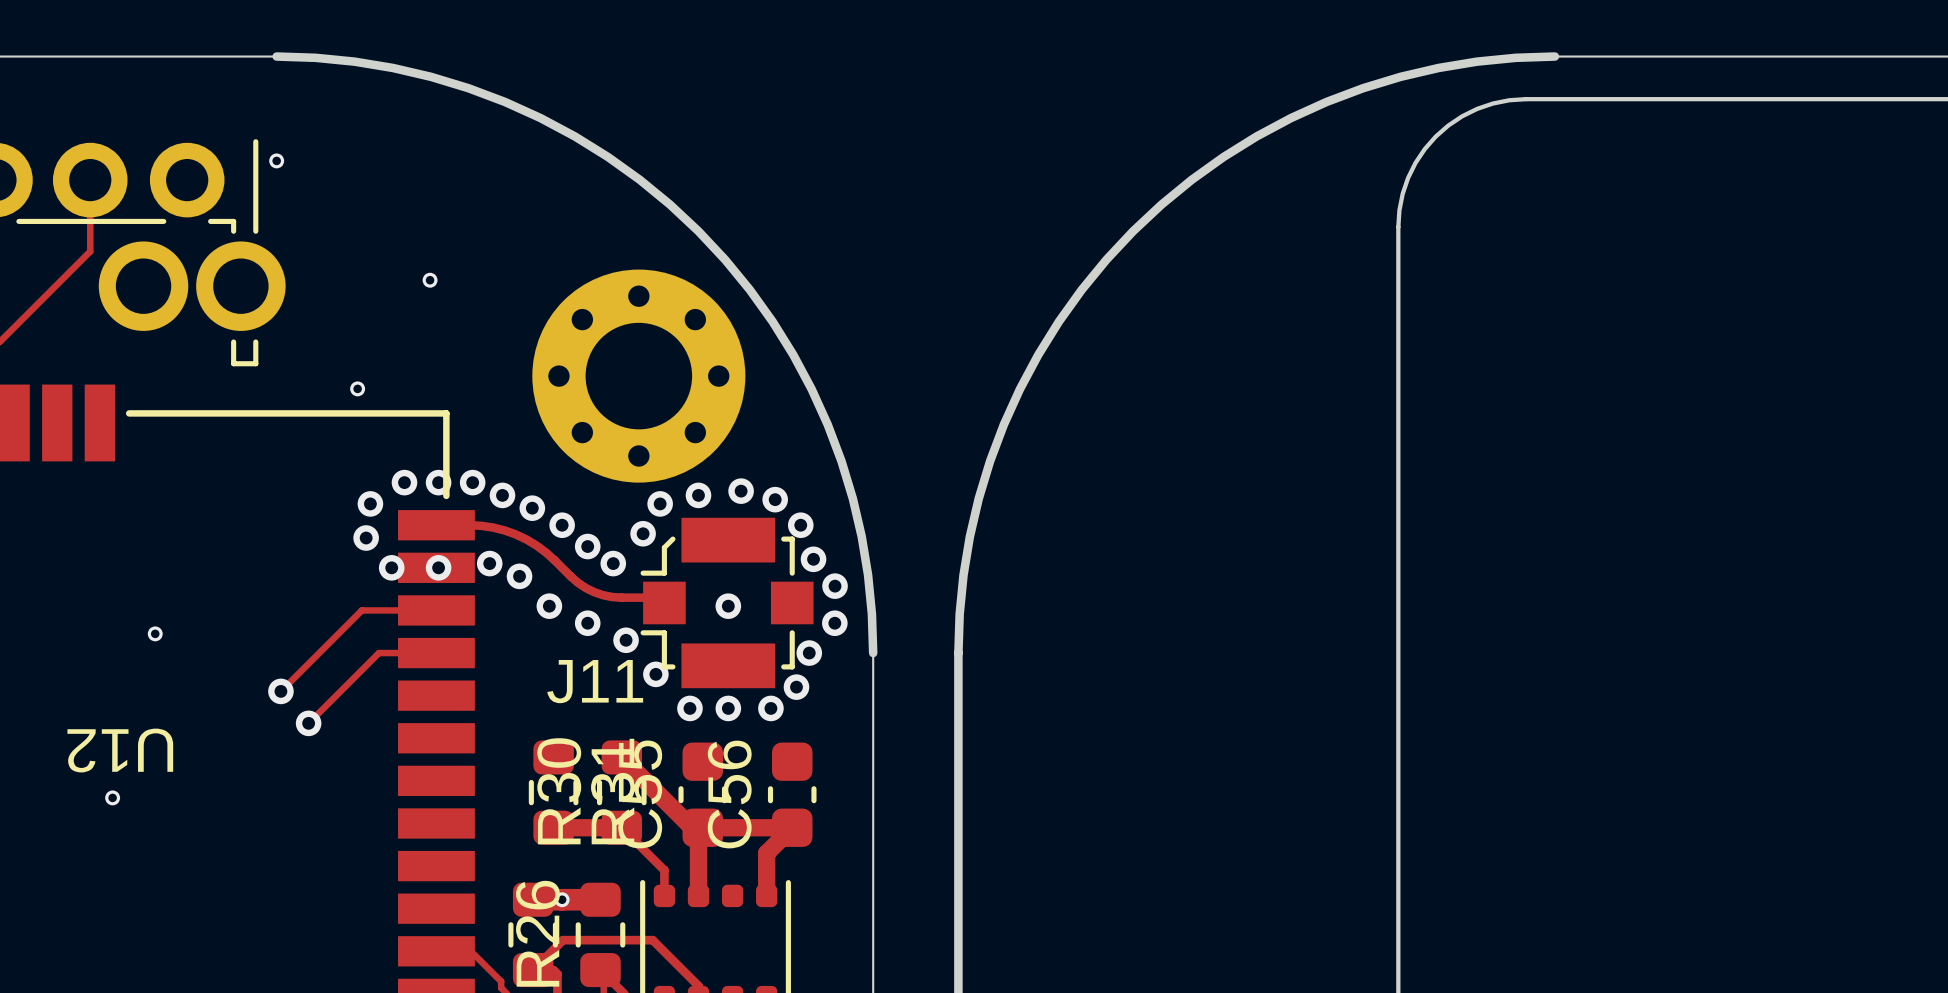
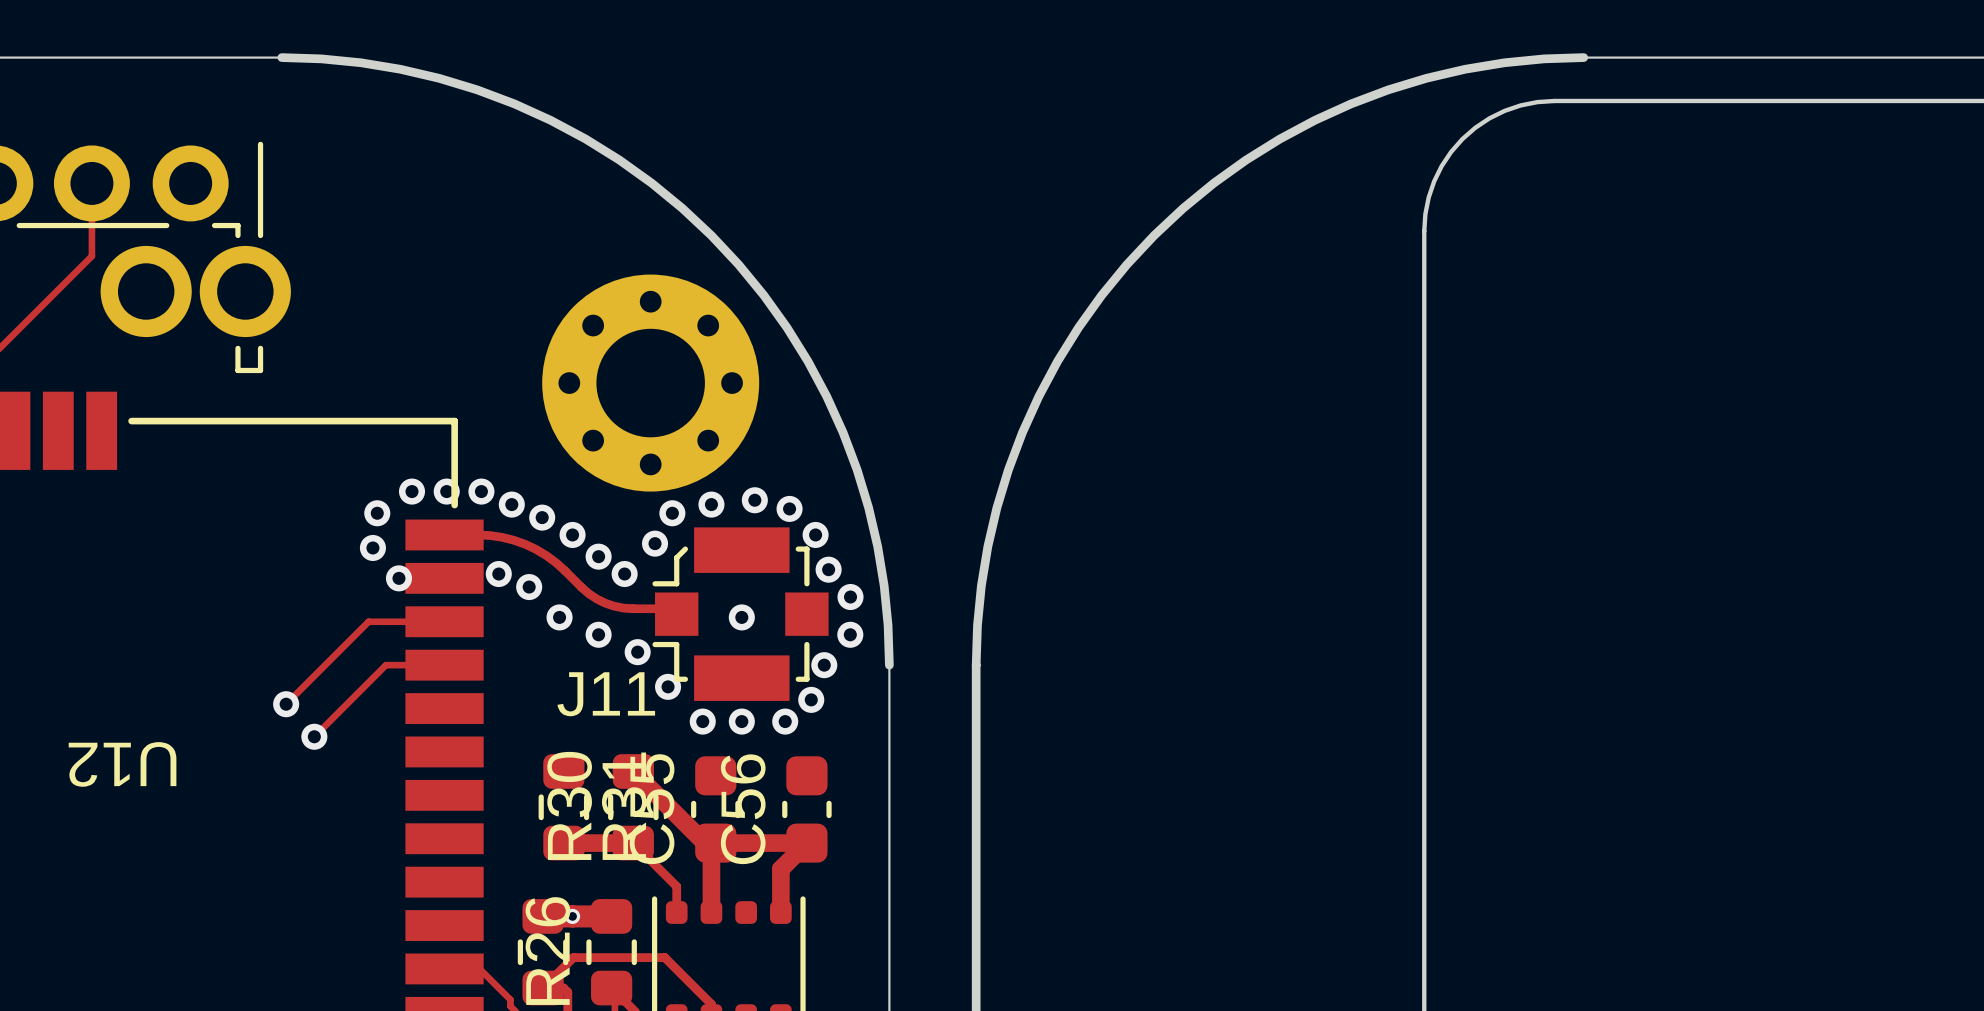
via: (276, 160) -> none
via: (430, 280) -> none
via: (357, 388) -> none
via: (438, 567) -> none
via: (155, 633) -> none
via: (112, 797) -> none

